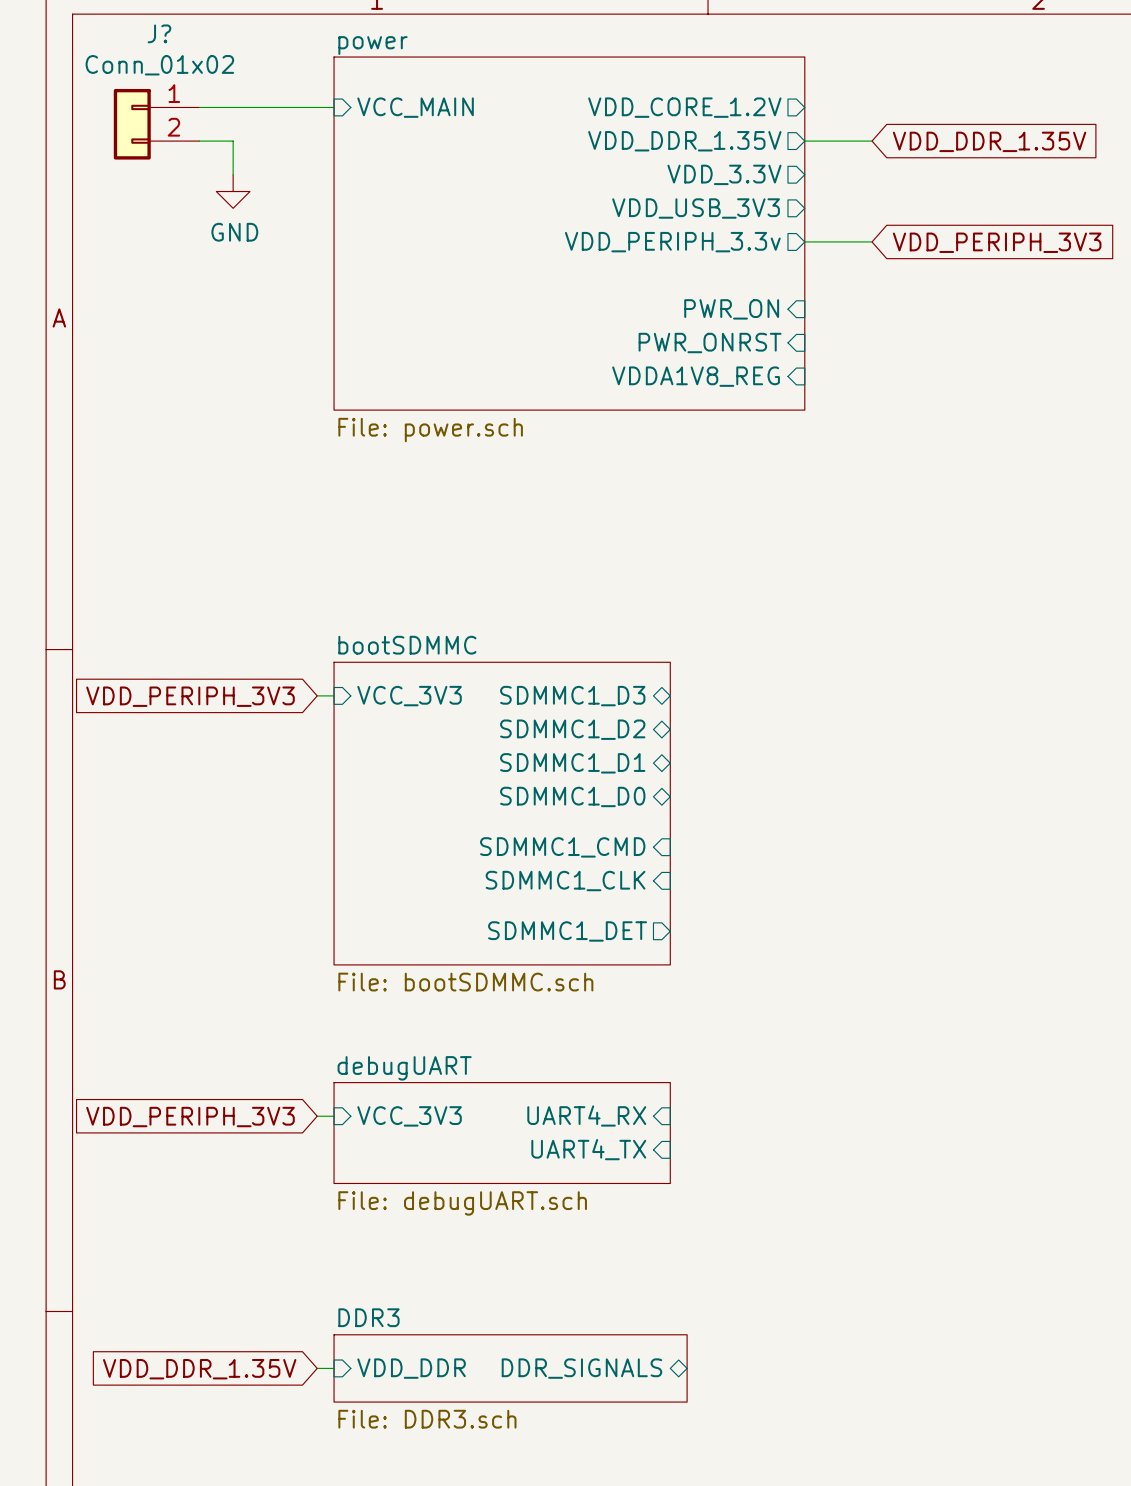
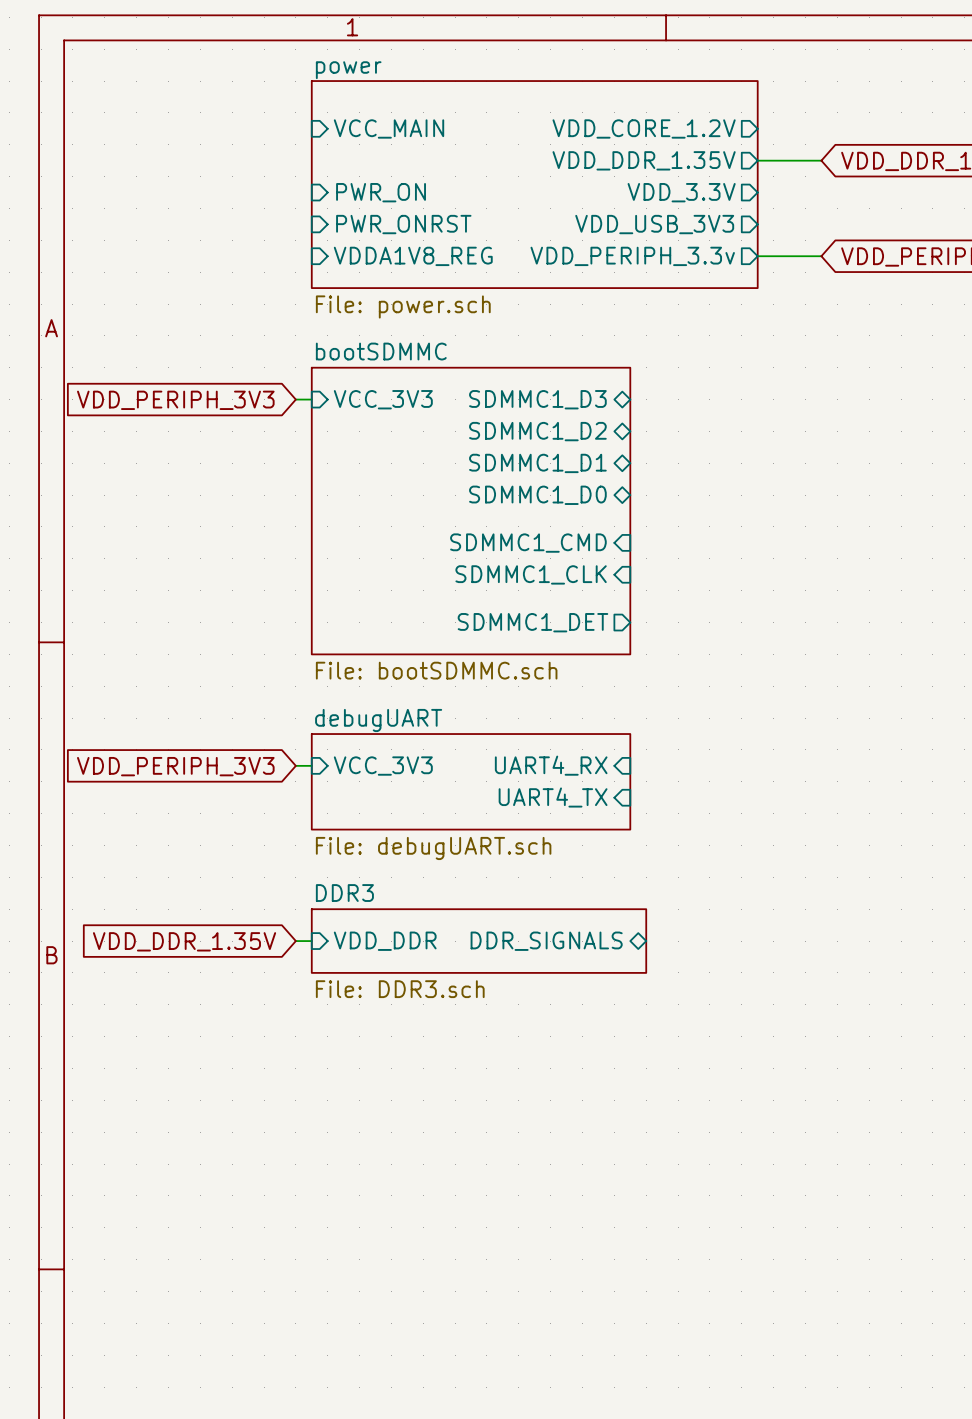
wire: (199, 107) (334, 107) -> none
J?: Conn_01x02 (156, 124) -> none
wire: (199, 141) (233, 141) (233, 174) -> none
sheet power: none -> File: power.sch (534, 184)
sheet pin: none -> PWR_ON (381, 192)
power symbol: GND (233, 191) -> none
sheet pin: none -> PWR_ONRST (403, 224)
sheet power: File: power.sch (569, 233) -> none
sheet pin: none -> VDDA1V8_REG (413, 256)
sheet pin: PWR_ON (731, 309) -> none
sheet pin: PWR_ONRST (710, 343) -> none
sheet pin: VDDA1V8_REG (696, 376) -> none
wire: none -> (295, 399) (311, 399)
sheet pin: none -> VCC_3V3 (383, 399)
global label: none -> VDD_PERIPH_3V3 (175, 400)
wire: (317, 695) (334, 695) -> (295, 765) (311, 765)
global label position: VDD_PERIPH_3V3 (190, 696) -> VDD_PERIPH_3V3 (175, 766)
sheet pin position: VCC_3V3 (409, 696) -> VCC_3V3 (383, 766)
sheet pin position: SDMMC1_D3 (572, 696) -> SDMMC1_D3 (537, 399)
sheet pin position: SDMMC1_D2 (572, 729) -> SDMMC1_D2 (537, 431)
sheet pin position: SDMMC1_D1 (572, 763) -> SDMMC1_D1 (537, 463)
sheet pin: none -> UART4_RX (551, 765)
sheet debugUART: none -> File: debugUART.sch (471, 781)
sheet pin position: SDMMC1_D0 (572, 796) -> SDMMC1_D0 (537, 495)
sheet bootSDMMC position: (502, 813) -> (471, 511)
sheet pin: none -> UART4_TX (553, 797)
sheet pin position: SDMMC1_CMD (562, 847) -> SDMMC1_CMD (528, 543)
sheet pin position: SDMMC1_CLK (565, 881) -> SDMMC1_CLK (531, 574)
sheet pin position: SDMMC1_DET (567, 931) -> SDMMC1_DET (532, 622)
global label: none -> VDD_DDR_1.35V (184, 941)
sheet pin: none -> VDD_DDR (385, 941)
sheet pin: none -> DDR_SIGNALS (546, 941)
wire: (317, 1116) (334, 1116) -> (295, 941) (311, 941)
sheet pin: VCC_3V3 (409, 1116) -> none
sheet pin: UART4_RX (586, 1116) -> none
global label: VDD_PERIPH_3V3 (190, 1117) -> none
sheet debugUART: File: debugUART.sch (502, 1133) -> none
sheet pin: UART4_TX (588, 1149) -> none
wire: (317, 1368) (334, 1368) -> none
sheet pin: VDD_DDR (411, 1368) -> none
sheet DDR3 position: (510, 1368) -> (479, 941)
sheet pin: DDR_SIGNALS (581, 1368) -> none
global label: VDD_DDR_1.35V (199, 1369) -> none

